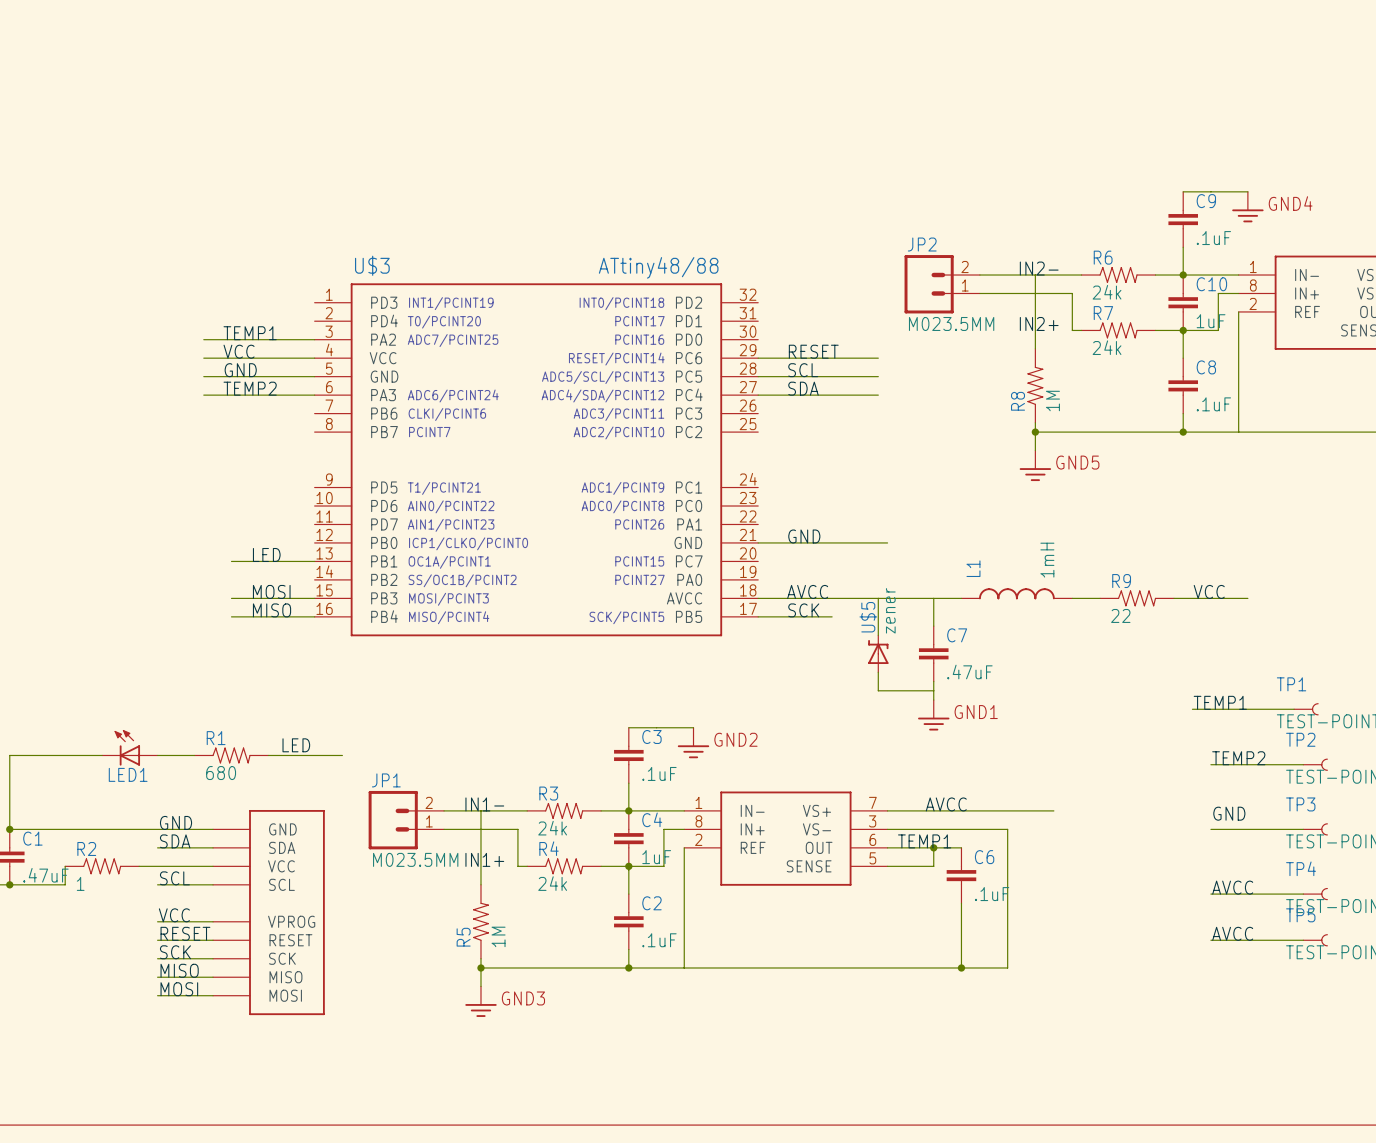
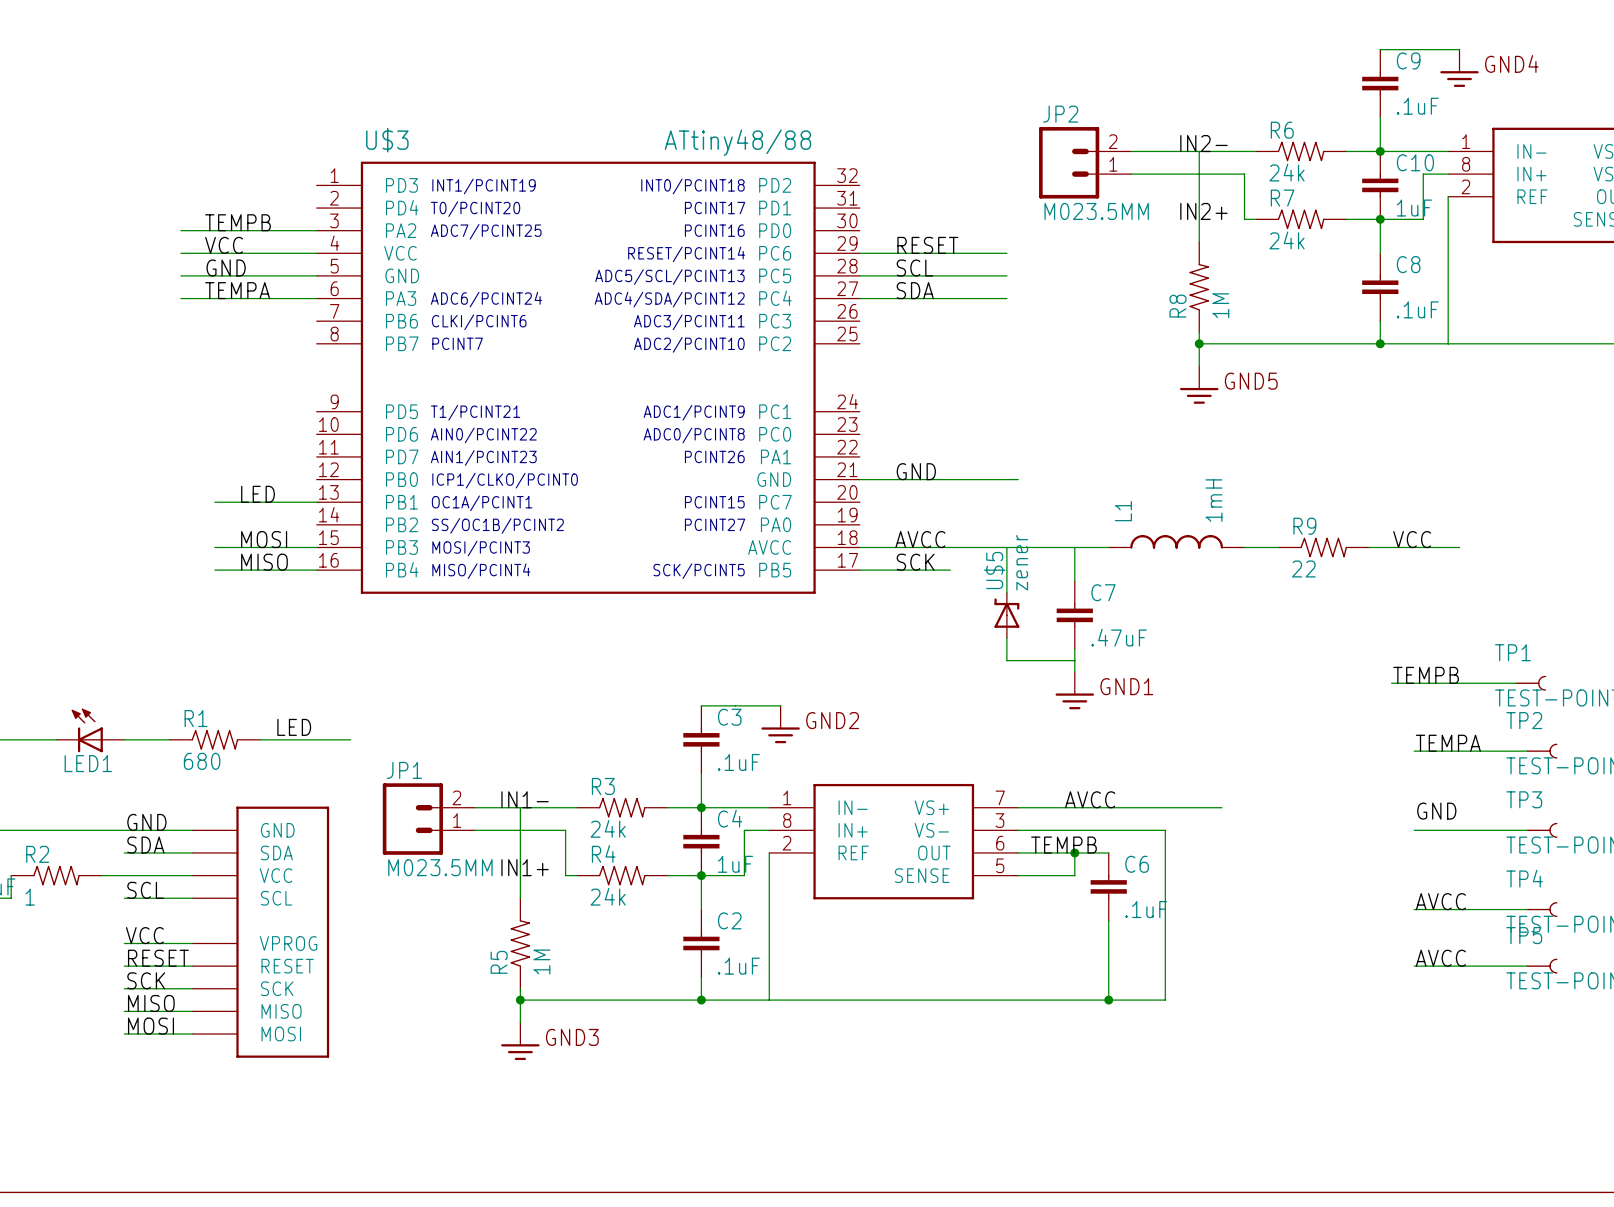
label: TEMP1 (250, 333) -> TEMPB (238, 222)
label: TEMP2 (250, 388) -> TEMPA (237, 290)
label: TEMP1 (1220, 702) -> TEMPB (1426, 675)
label: TEMP2 (1238, 758) -> TEMPA (1448, 743)
label: TEMP1 (924, 841) -> TEMPB (1063, 845)

